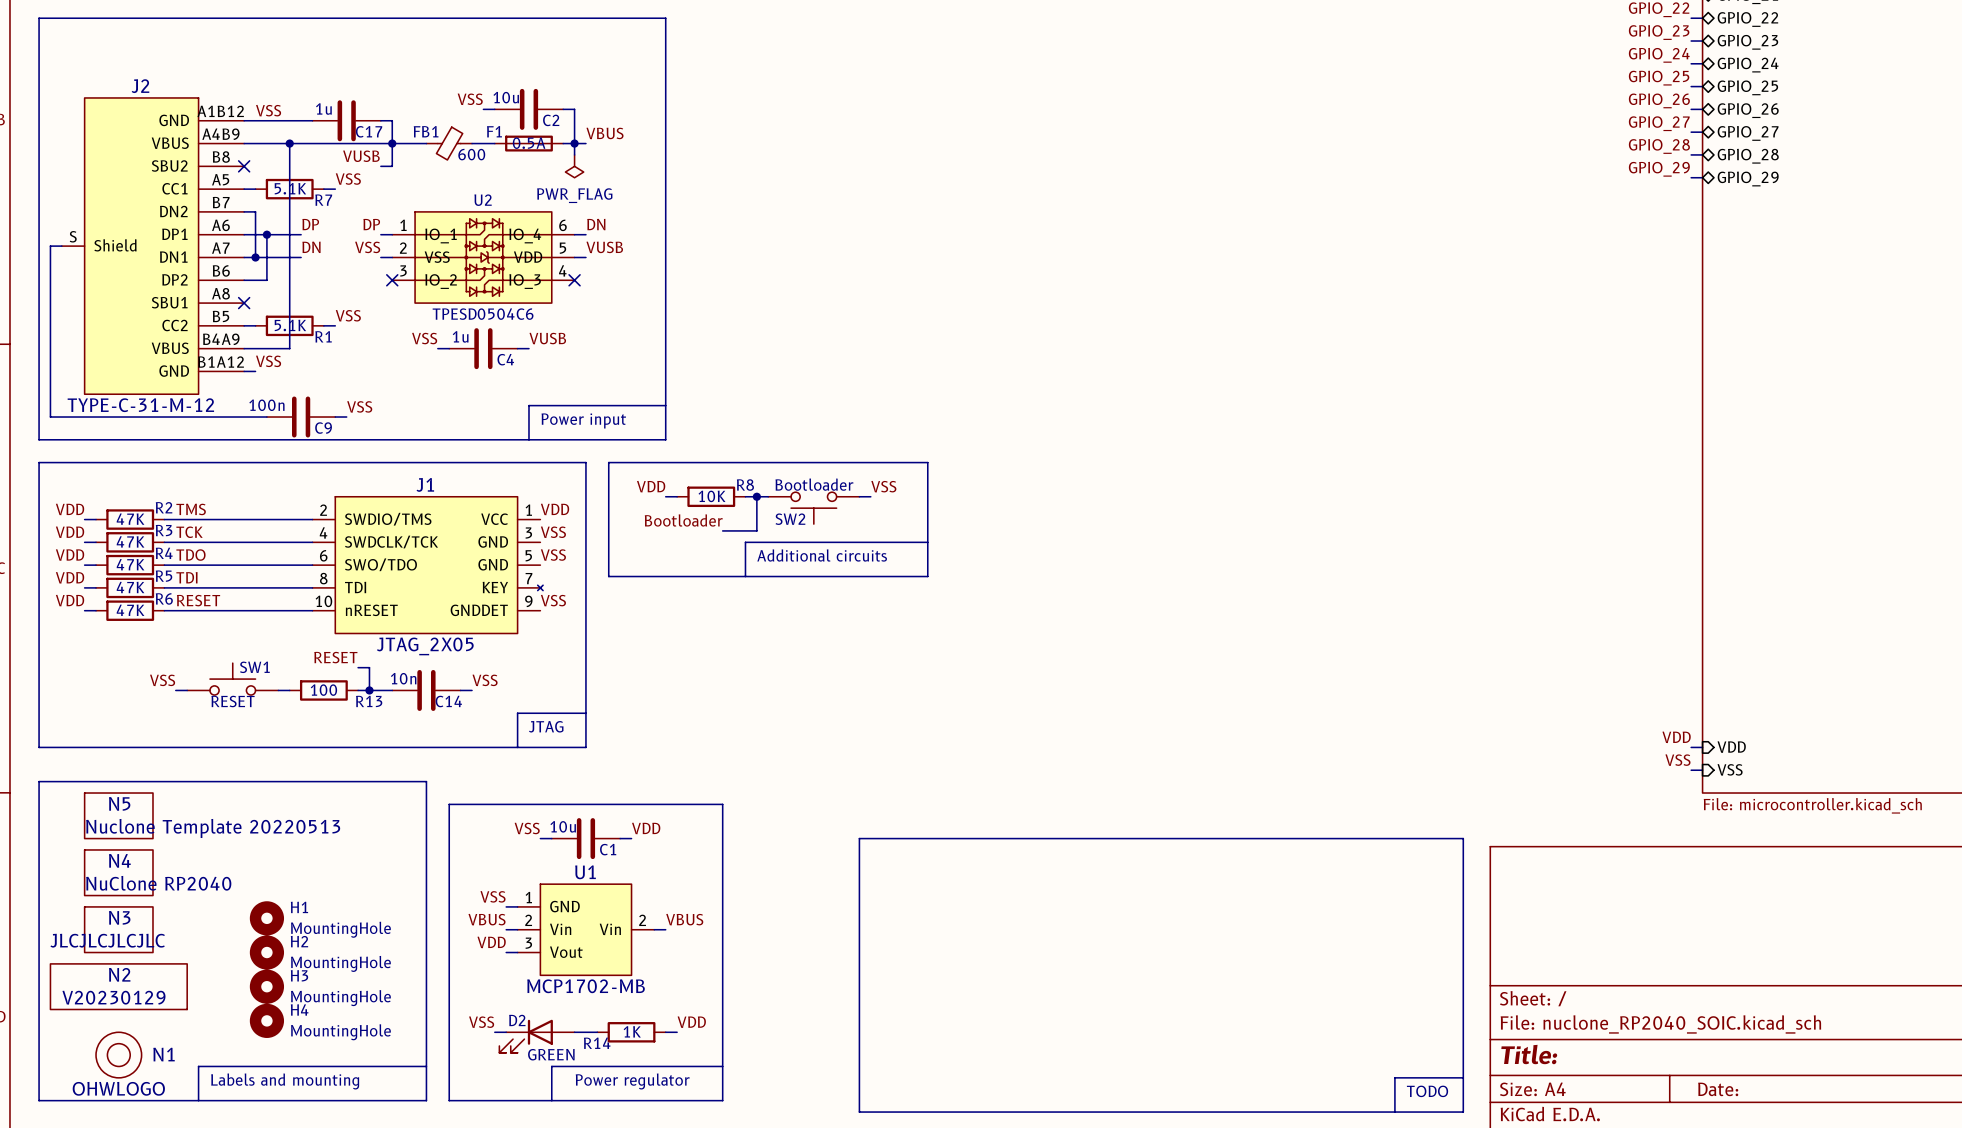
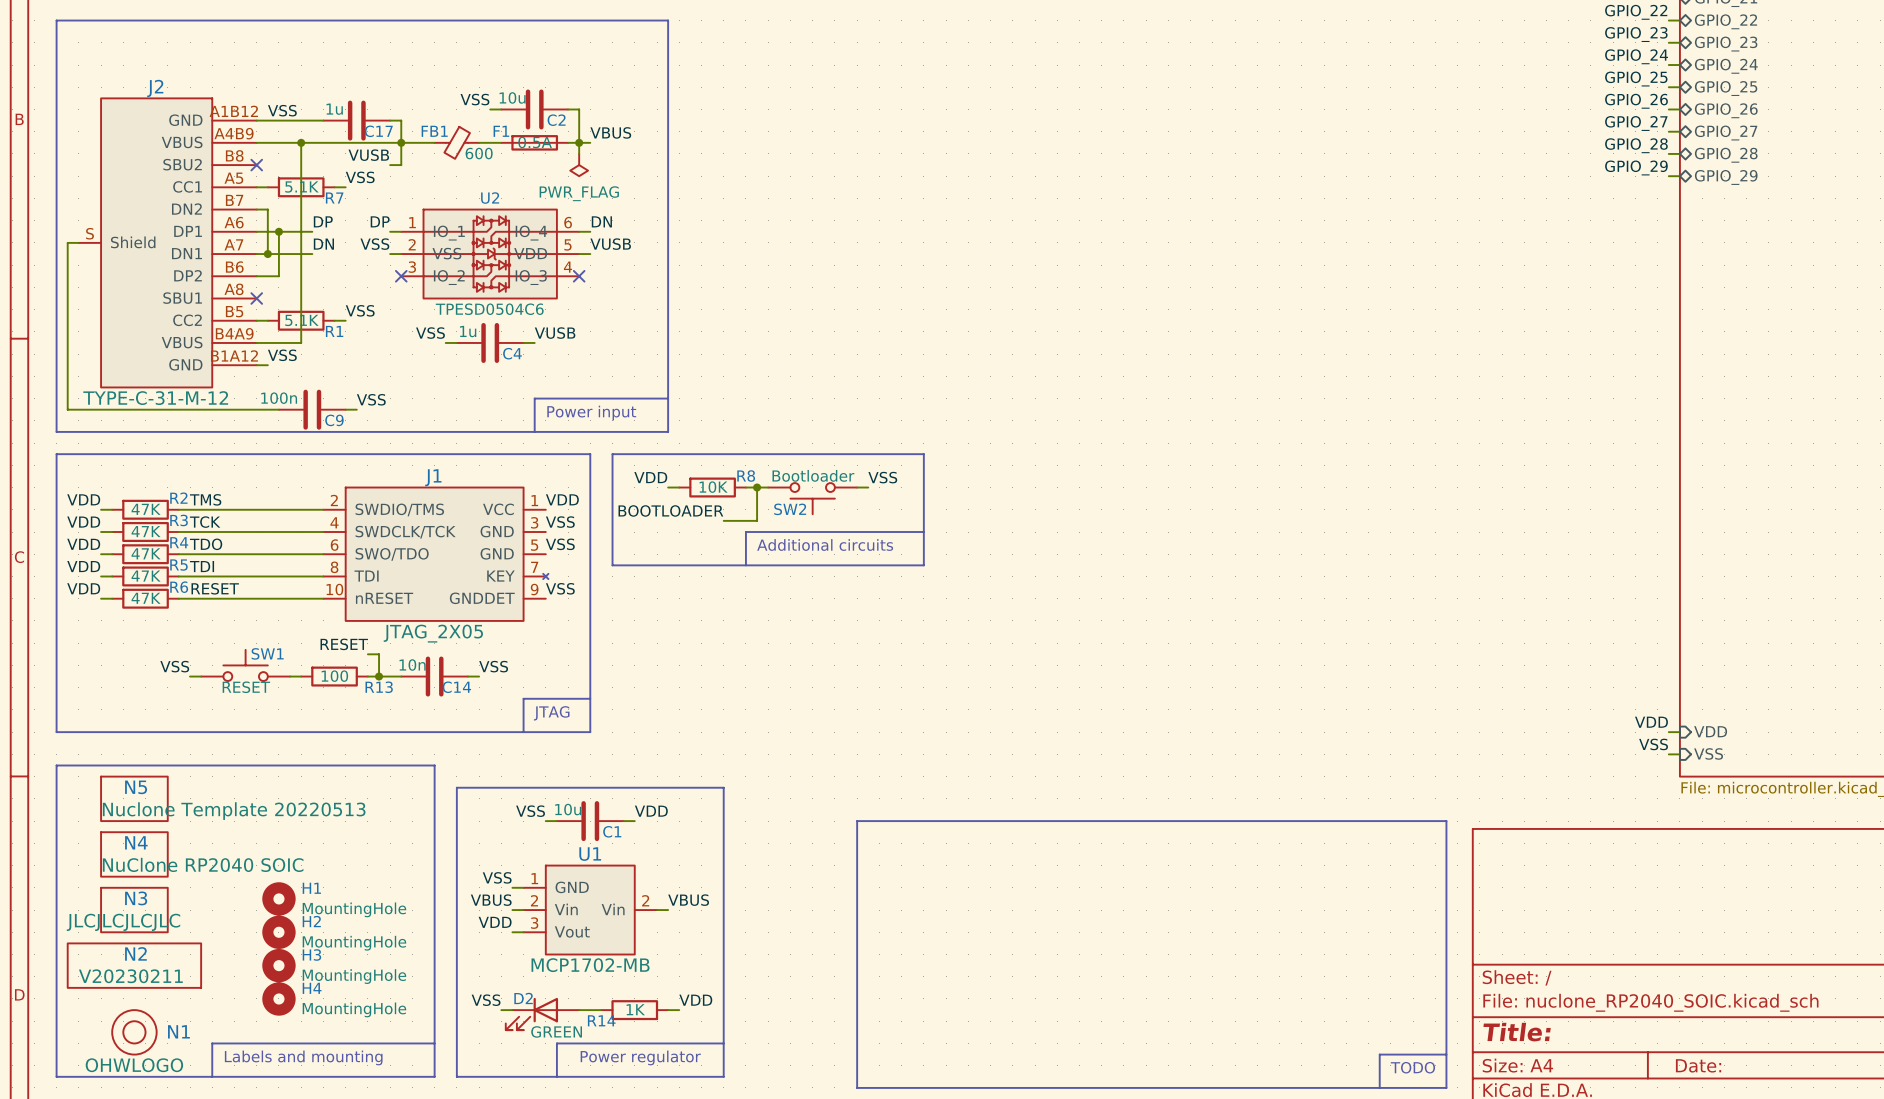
label: Bootloader (683, 520) -> BOOTLOADER (670, 510)
N4 value: NuClone RP2040 (158, 883) -> NuClone RP2040 SOIC (203, 864)
N2 value: V20230129 (113, 997) -> V20230211 (130, 976)

